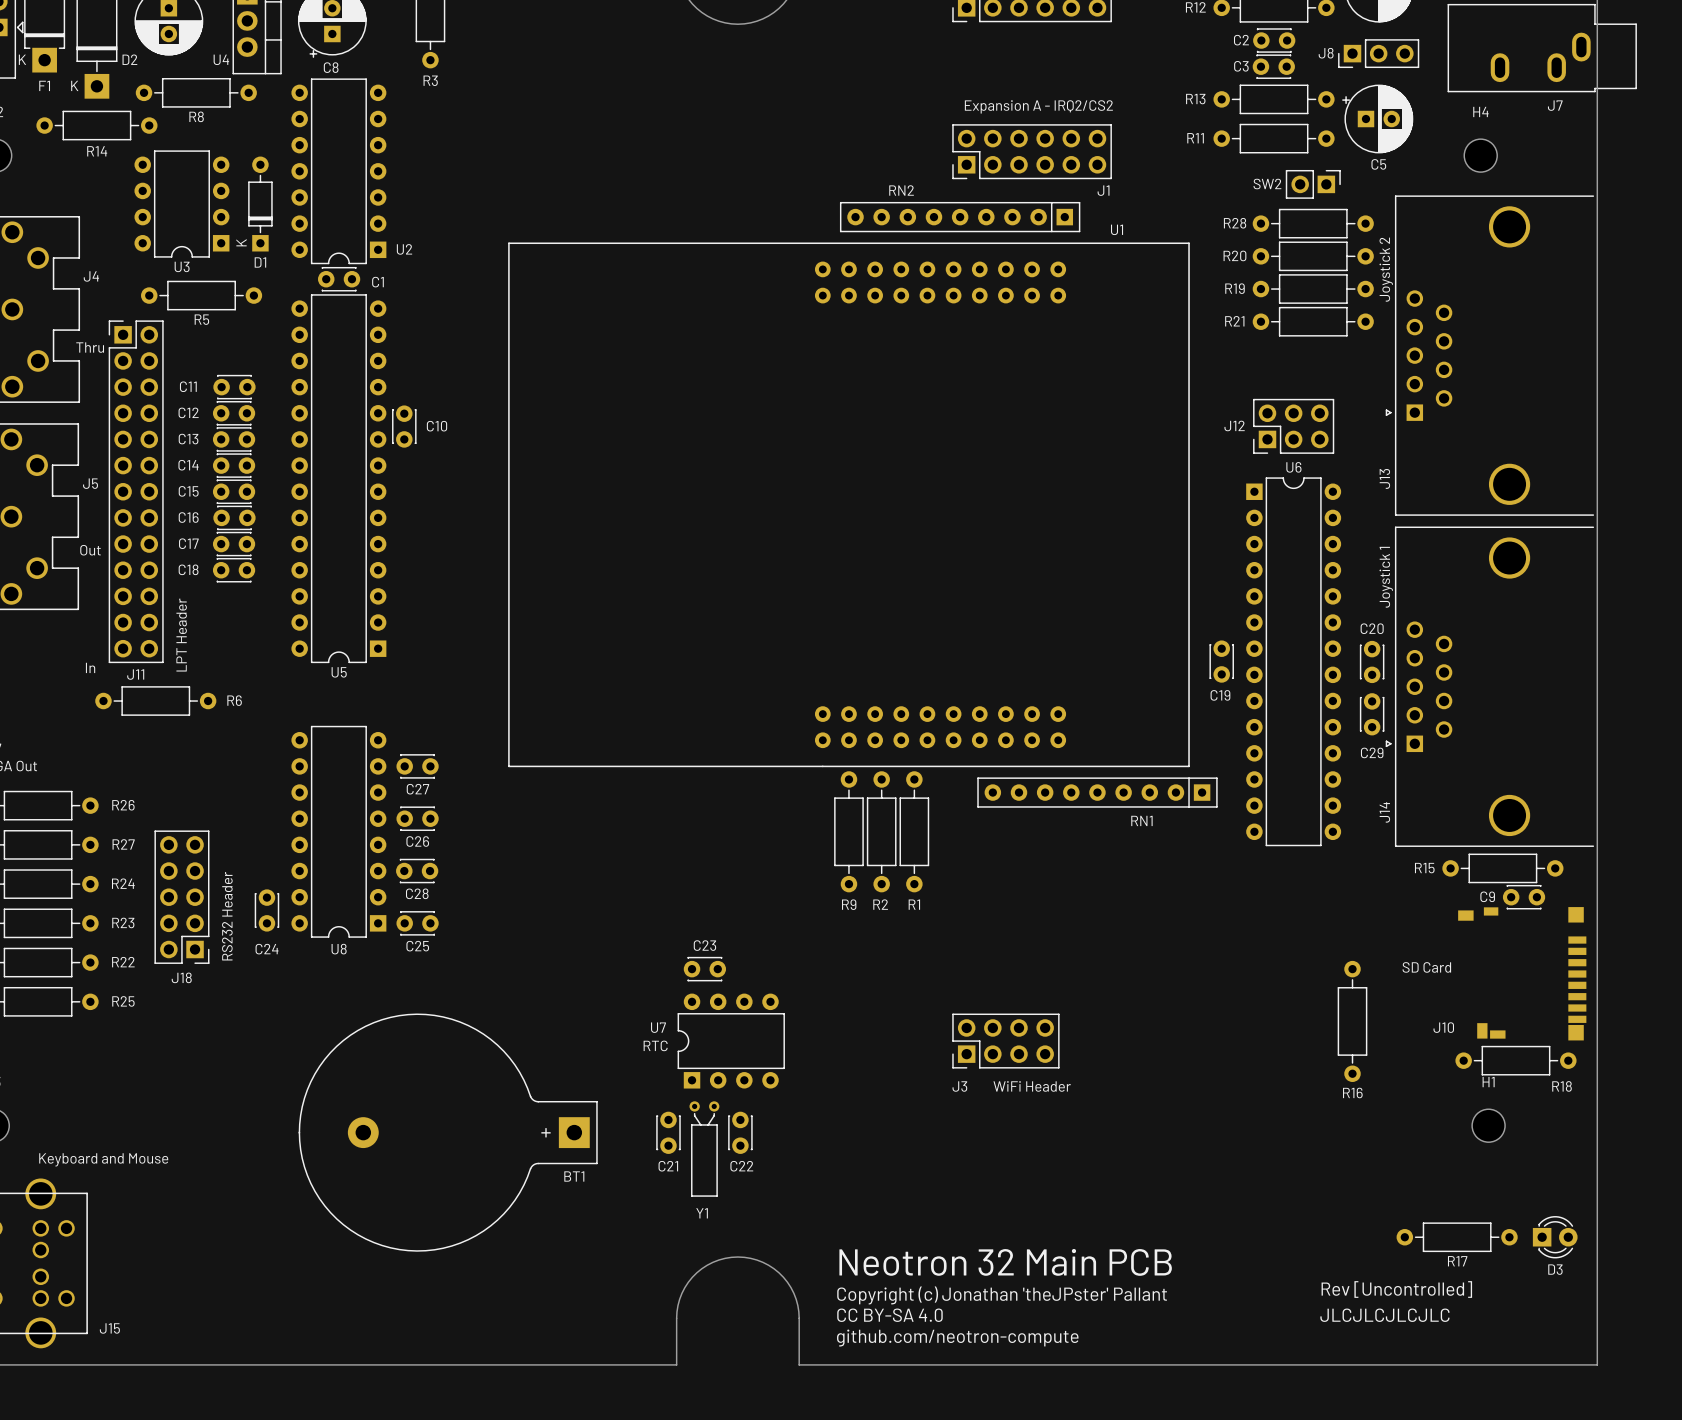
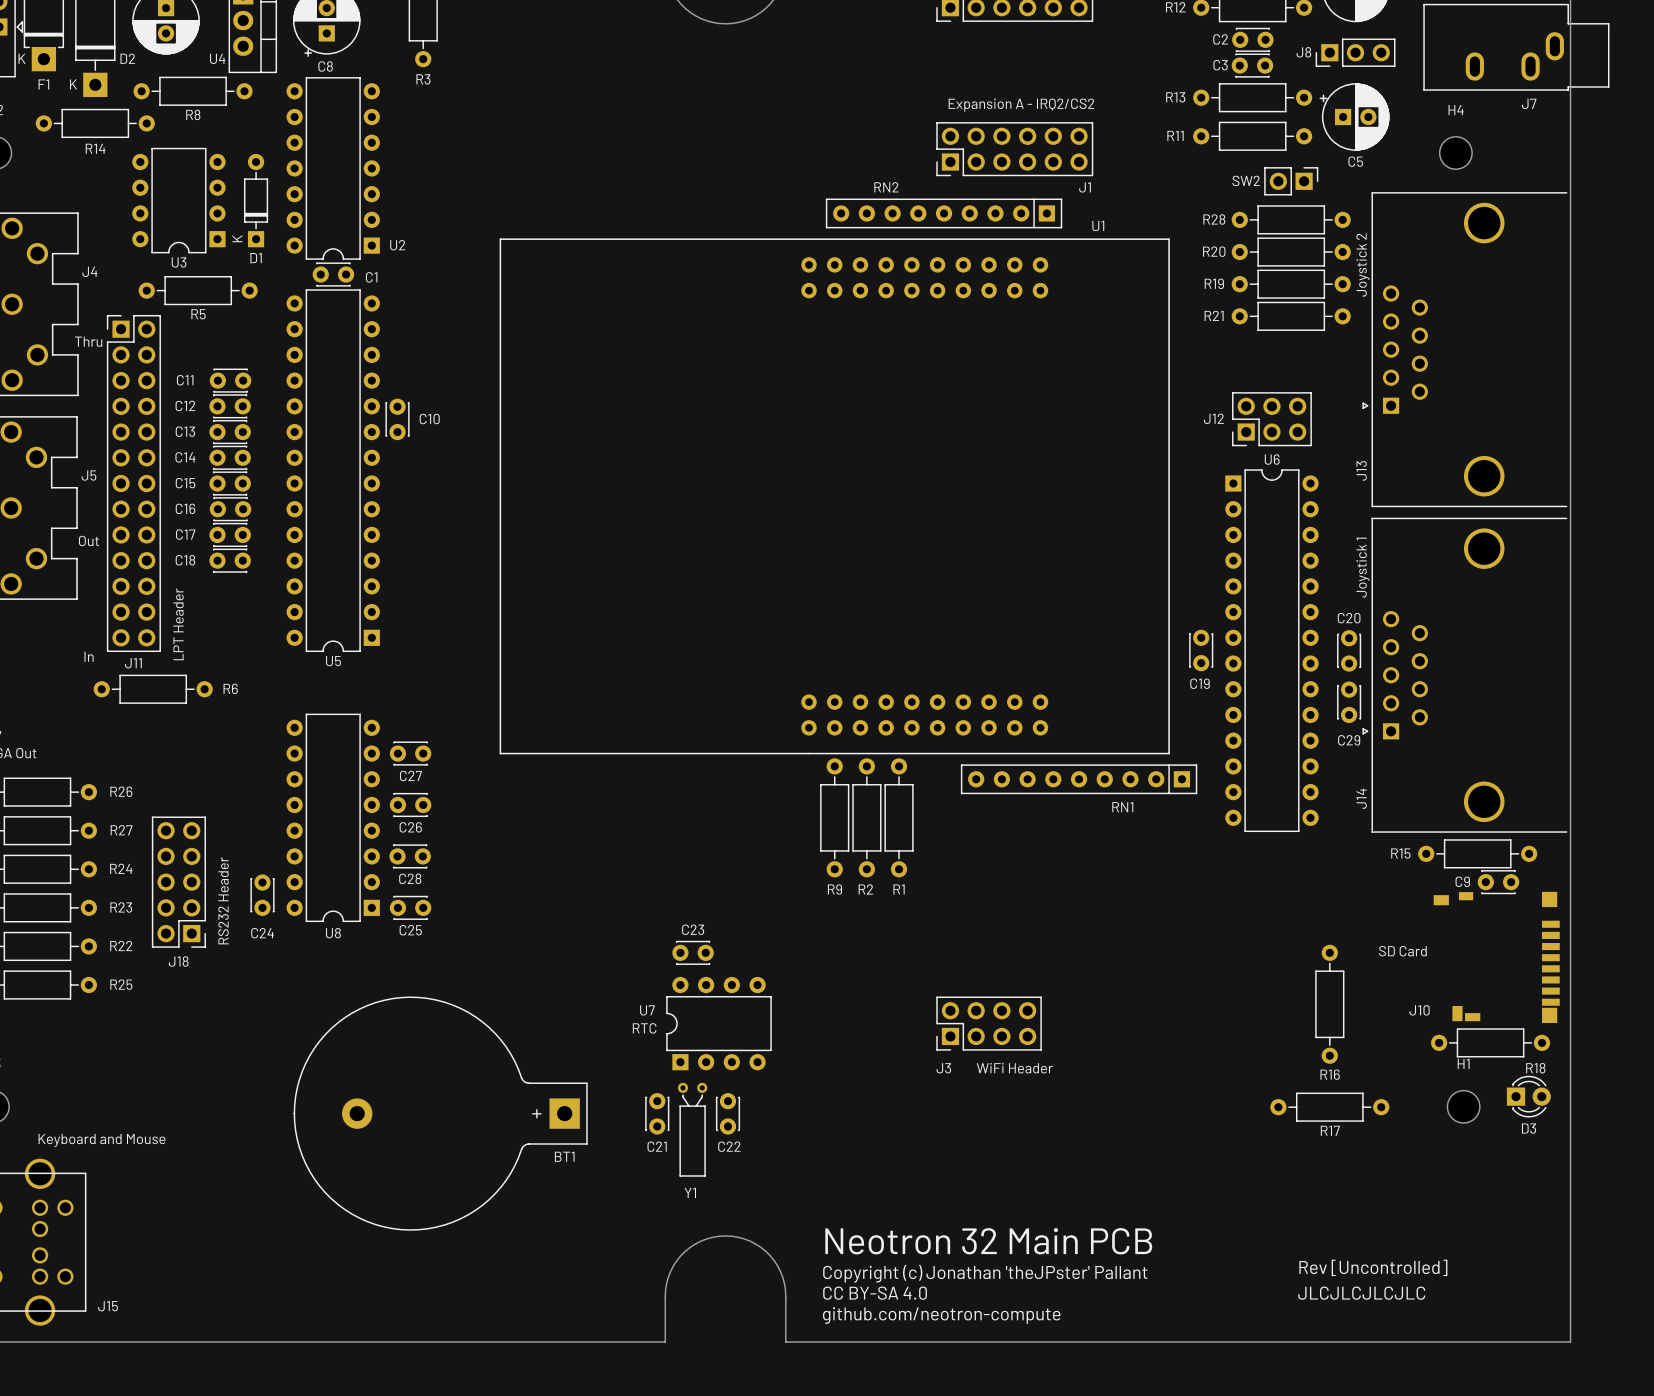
R17 position: (1457, 1237) -> (1329, 1107)
D3 position: (1555, 1237) -> (1528, 1096)

